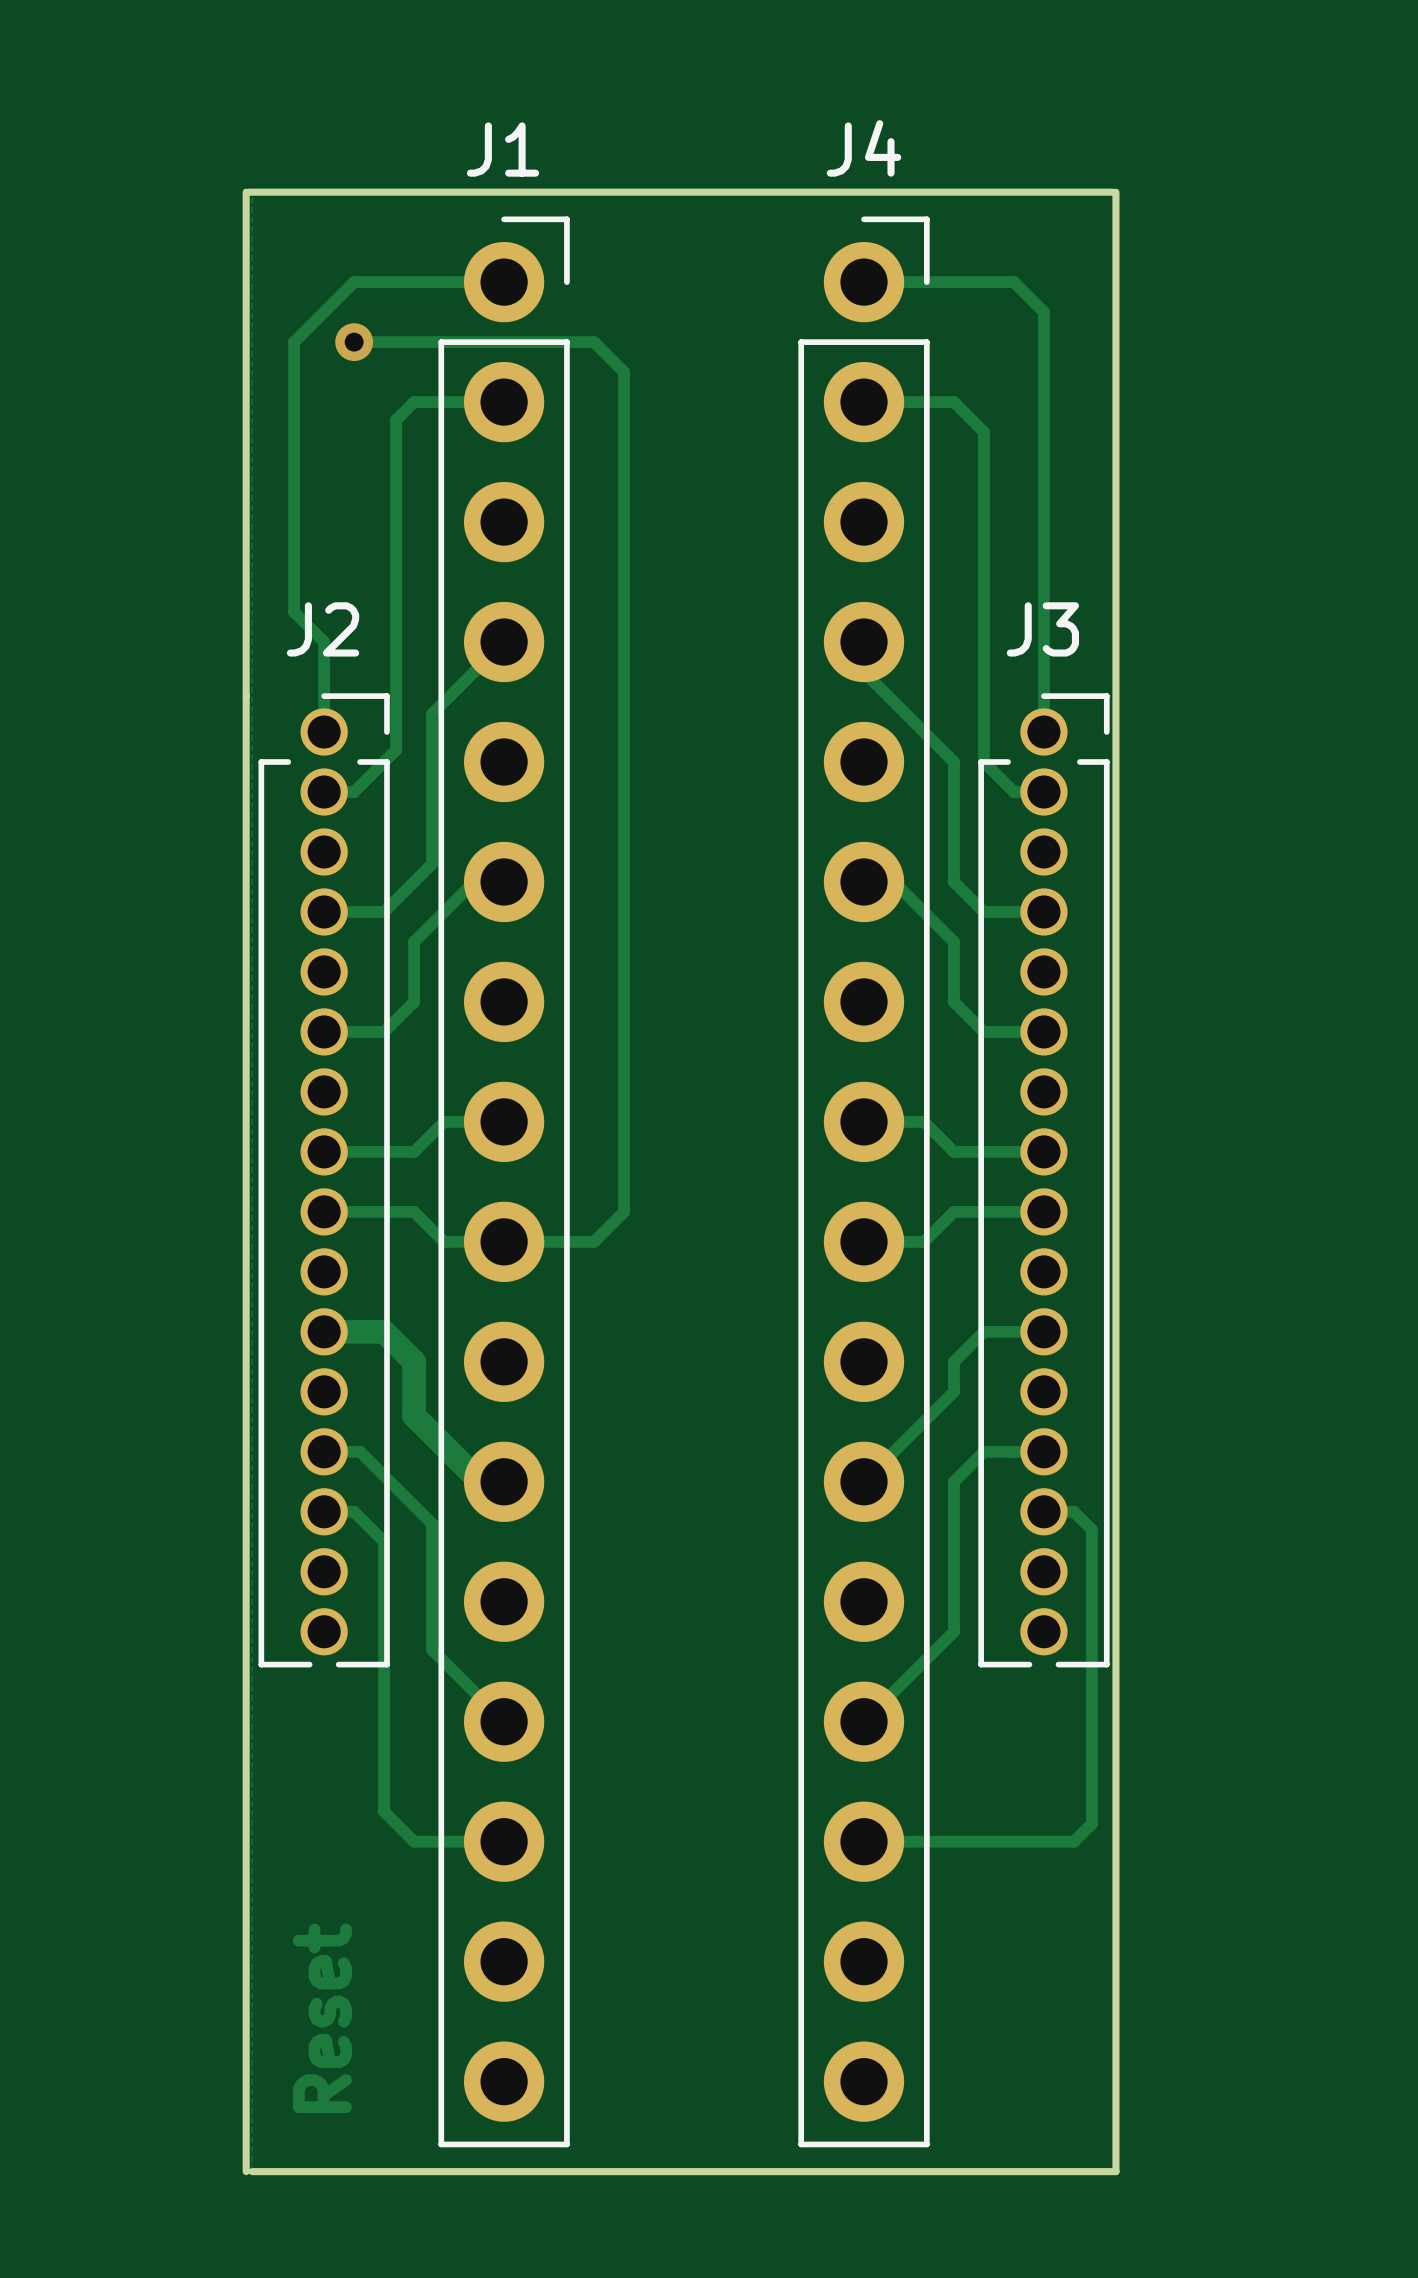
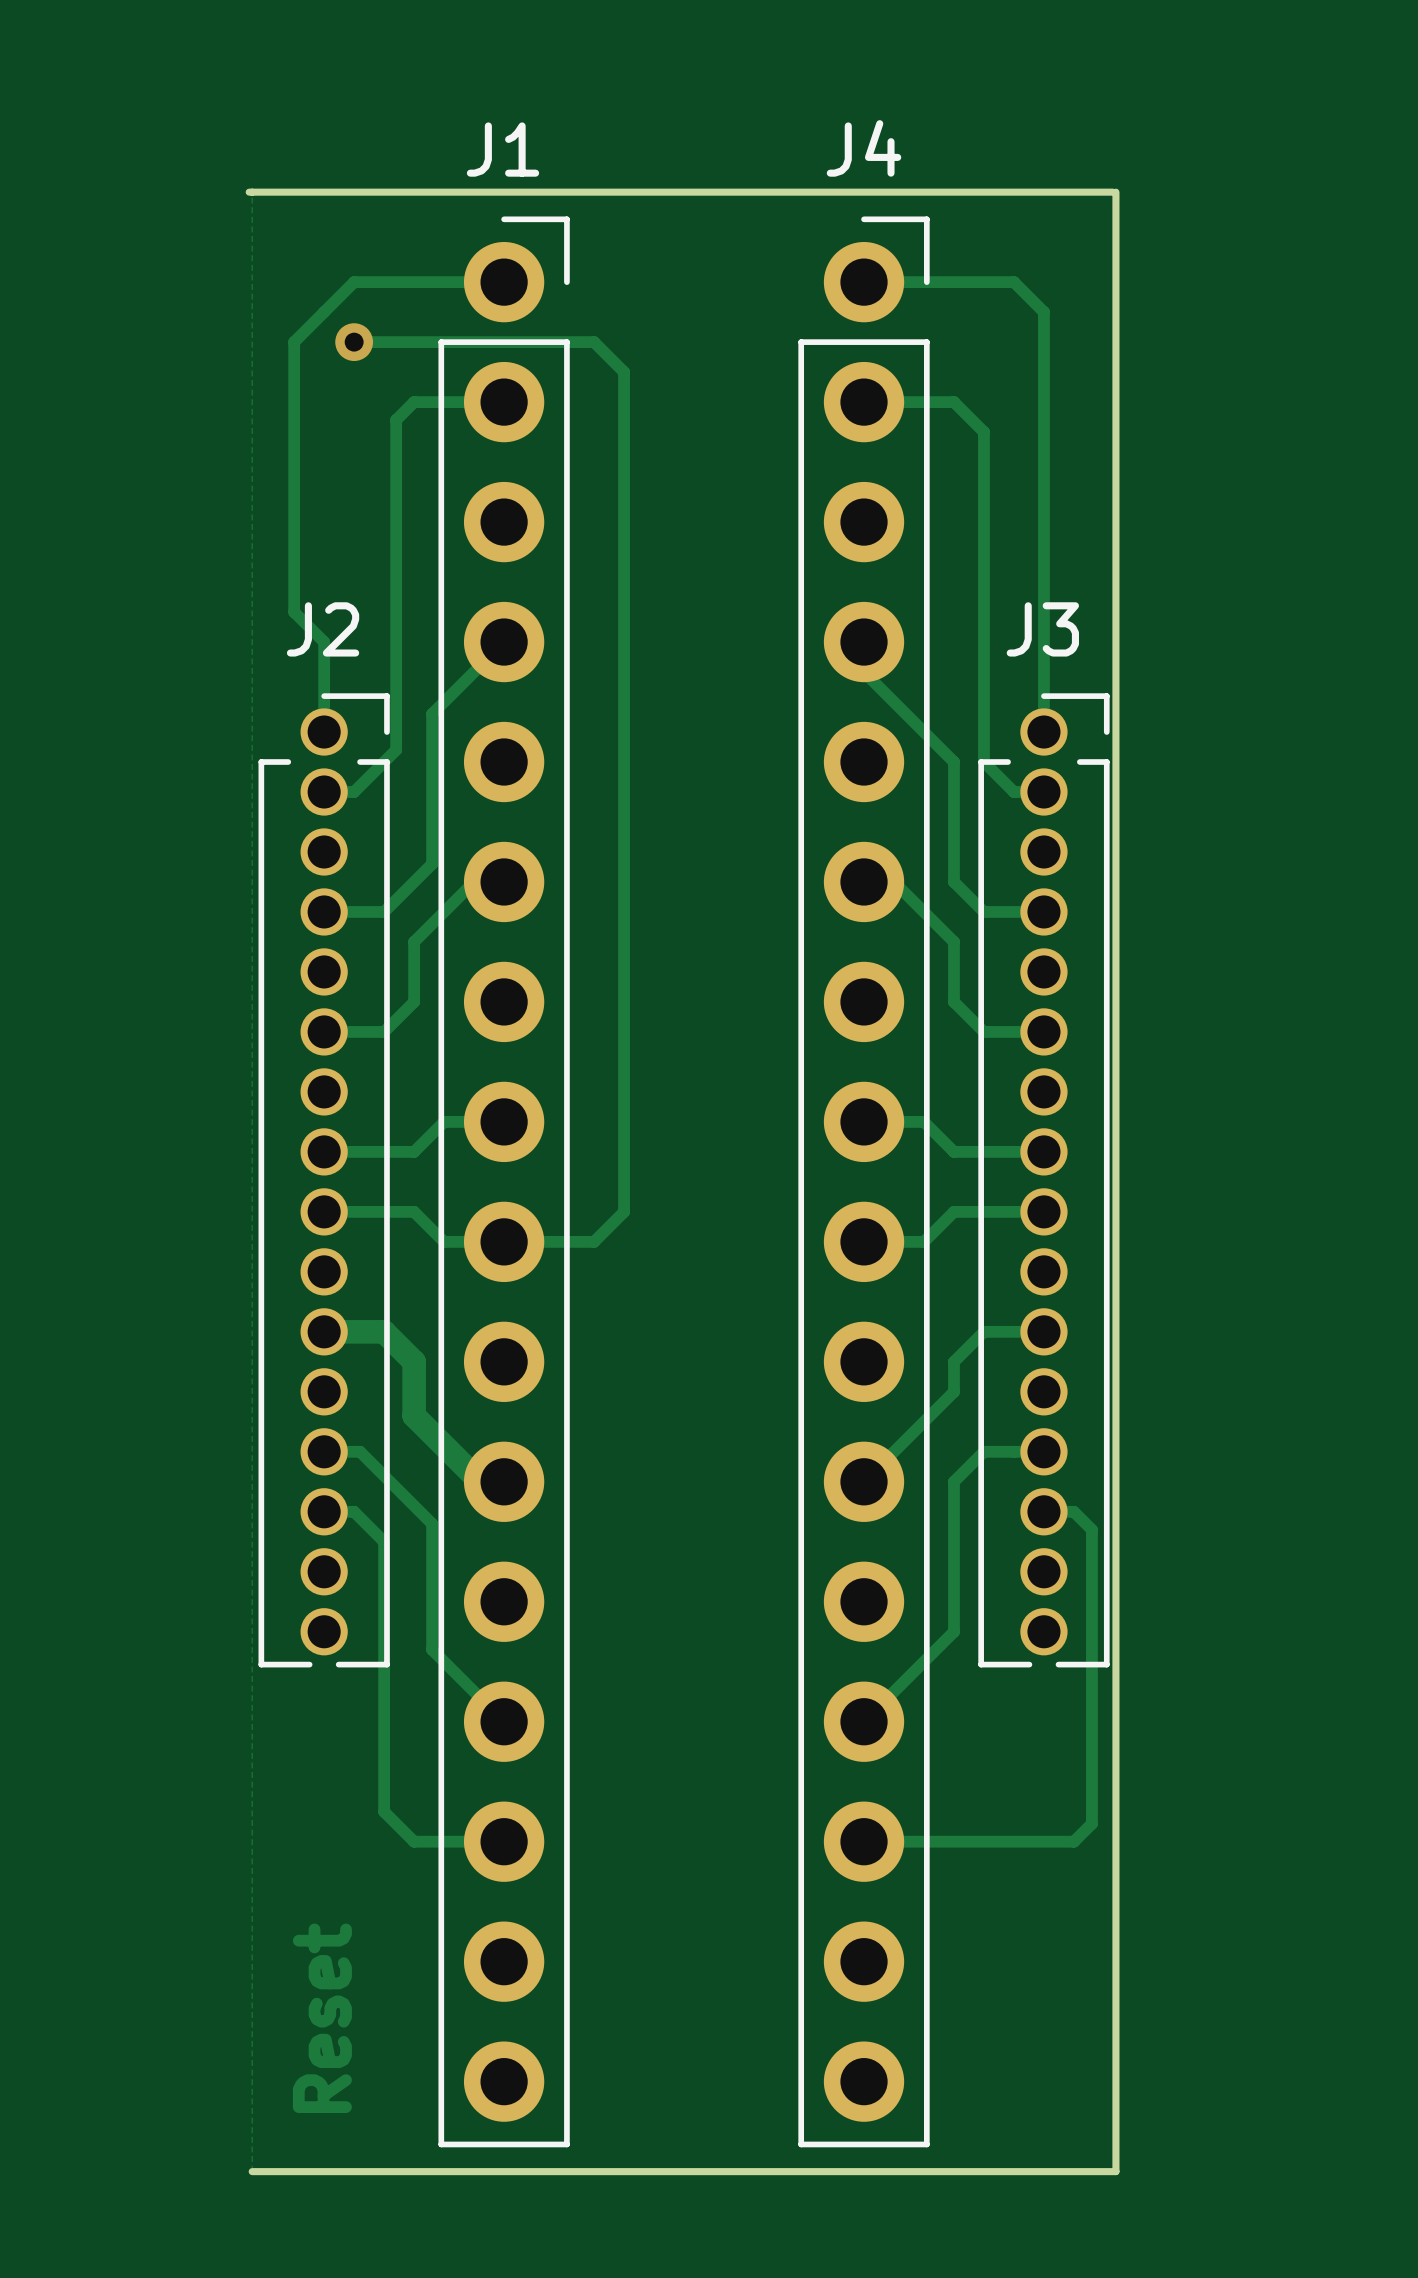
board edge: (246, 192) (246, 2171) -> none

